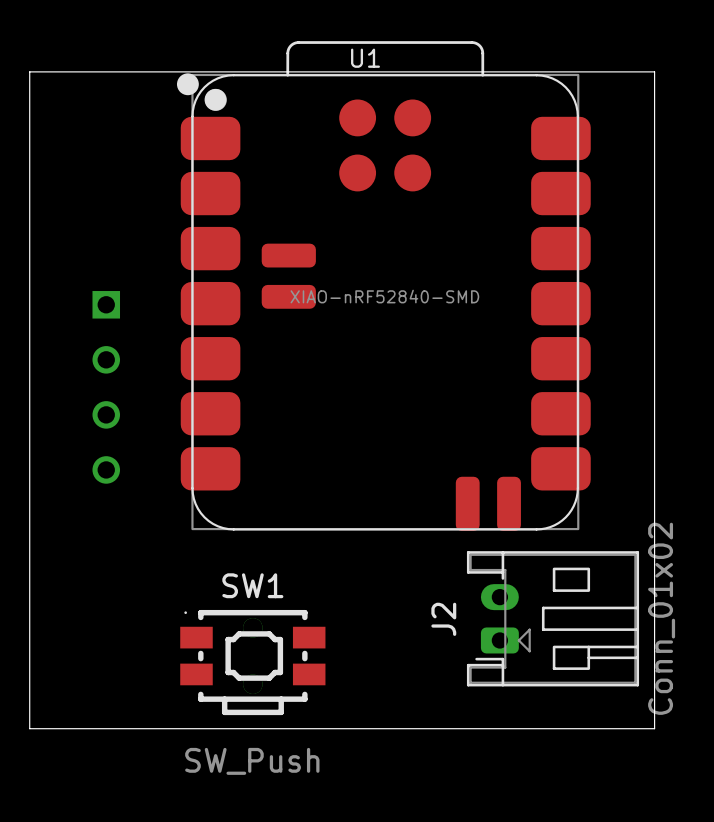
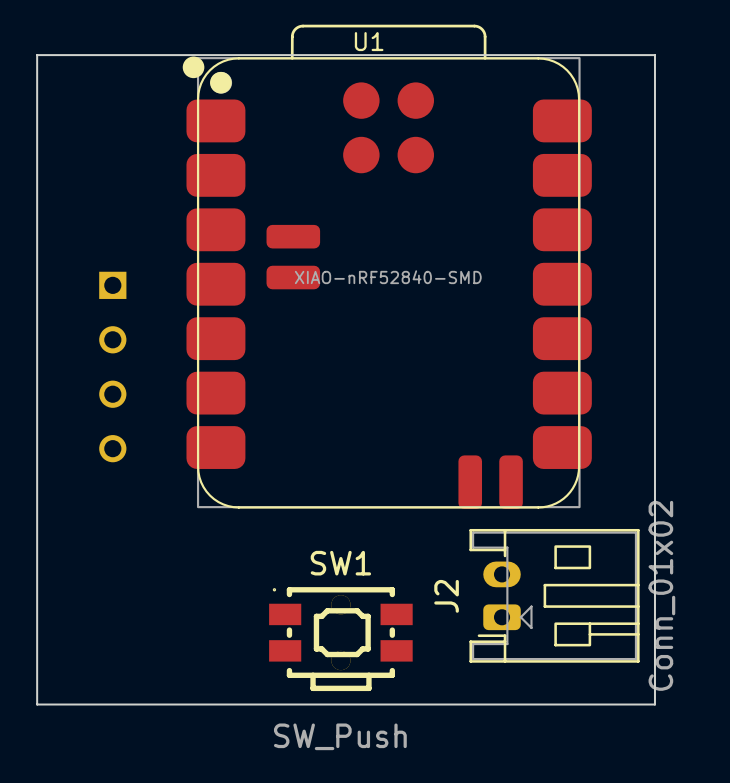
SW1 position: (252, 662) -> (340, 639)

